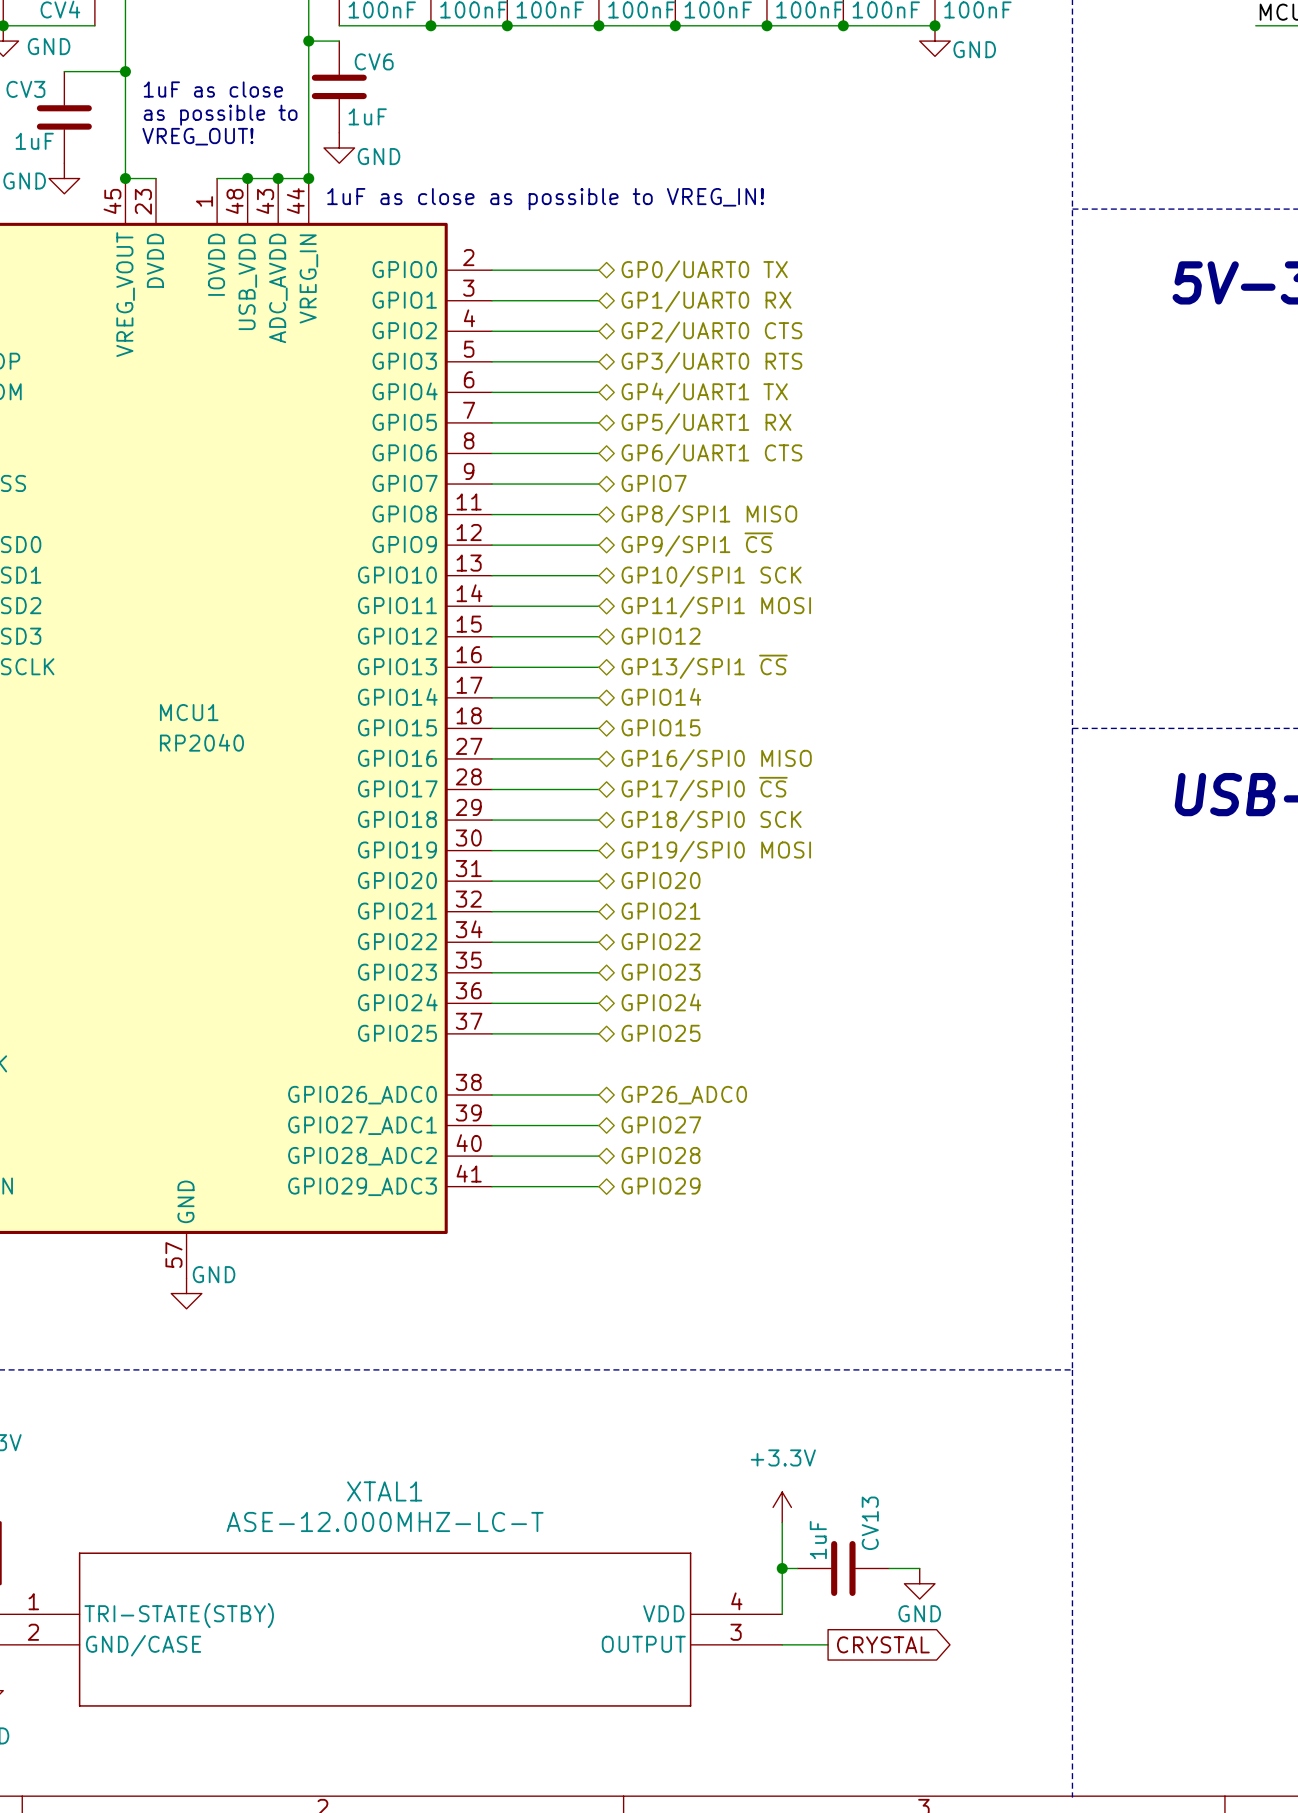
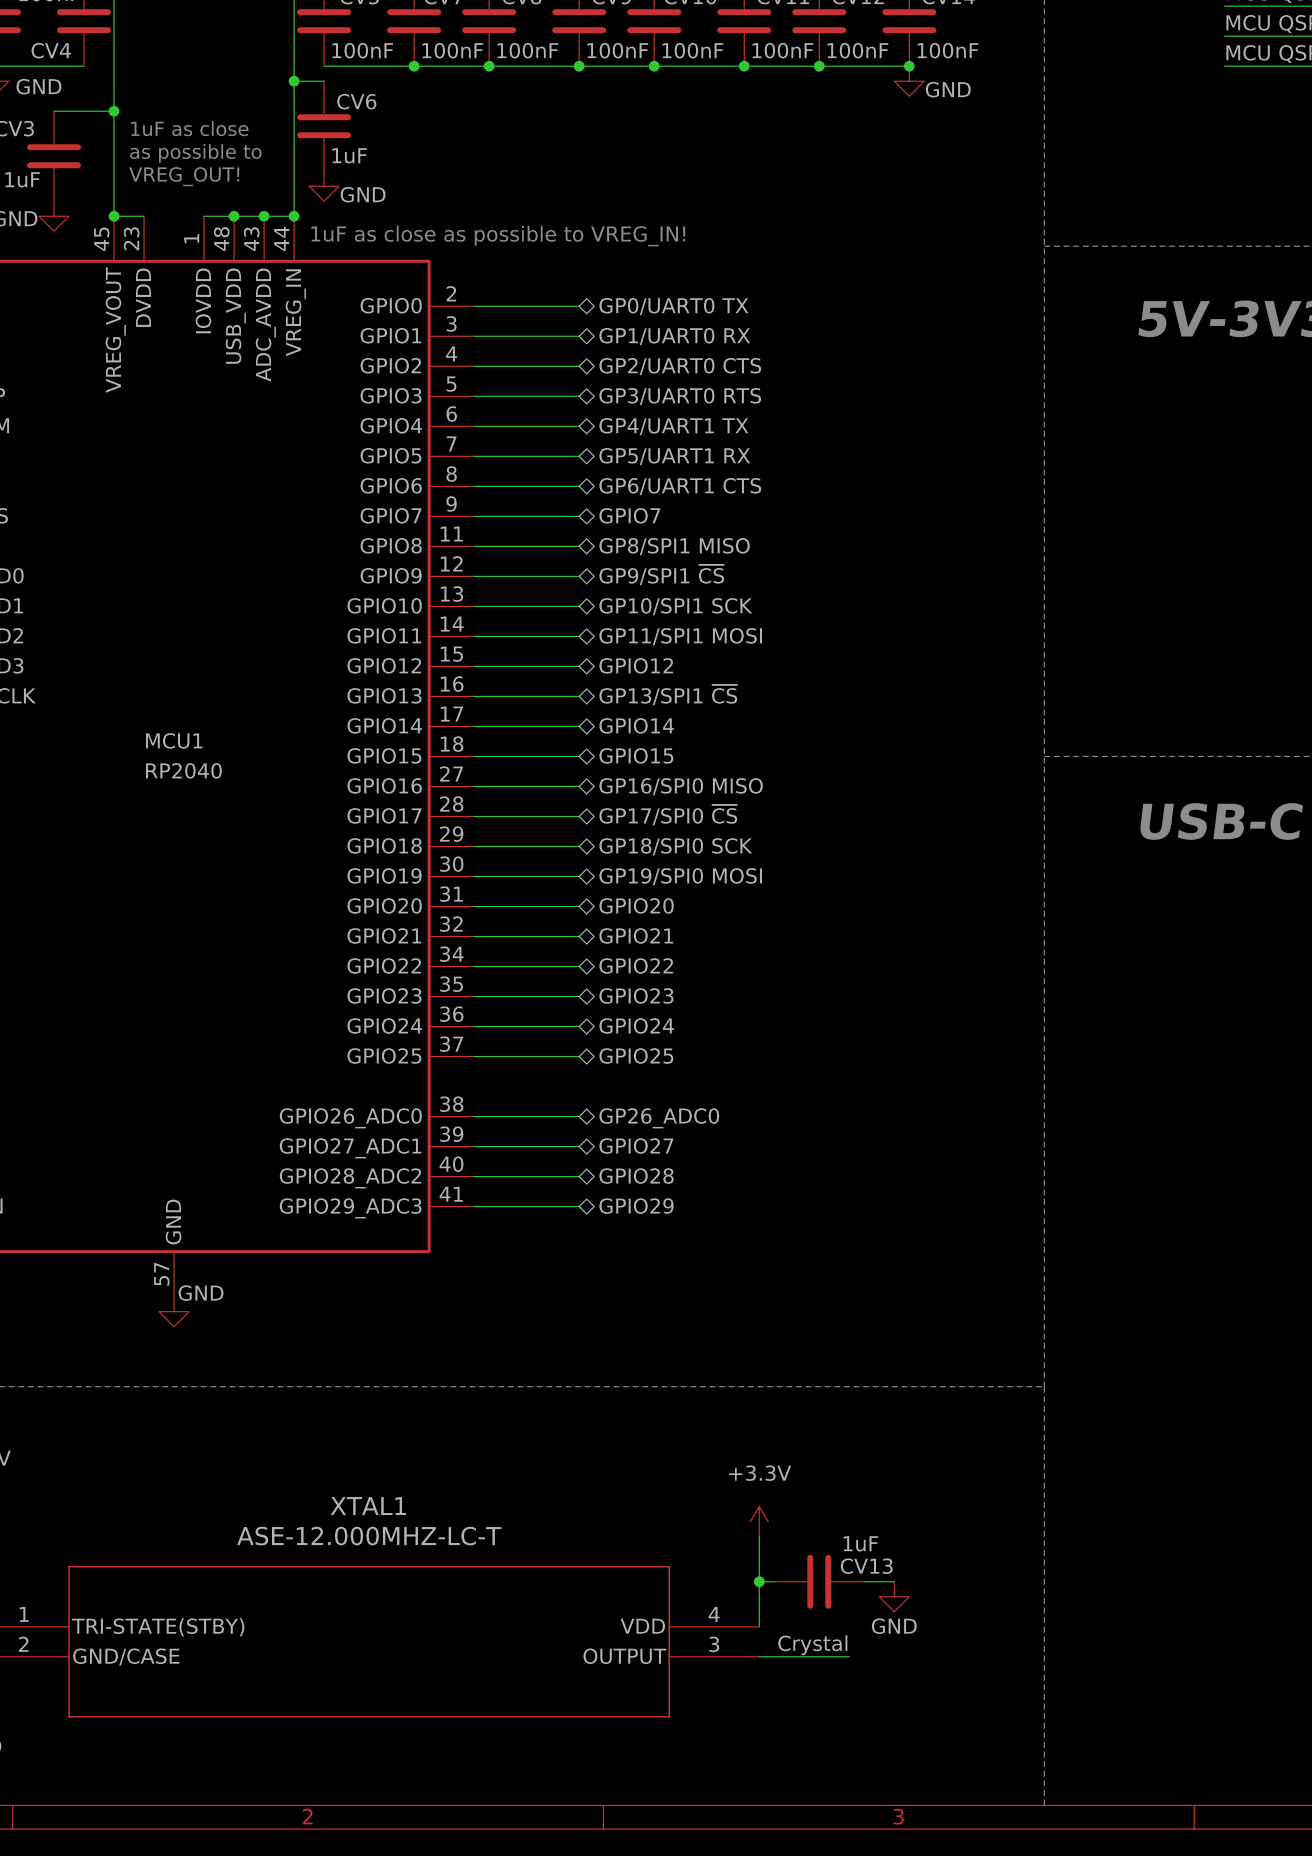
CV13 name rotation: 0° (870, 1523) -> 90° clockwise (866, 1566)
CV13 value rotation: 0° (818, 1540) -> 90° clockwise (860, 1543)
CV13 value position: 1uF (818, 1540) -> 1uF (860, 1543)
label: none -> Crystal (812, 1645)
wire: none -> (804, 1656) (849, 1656)
global label: CRYSTAL (883, 1644) -> none

